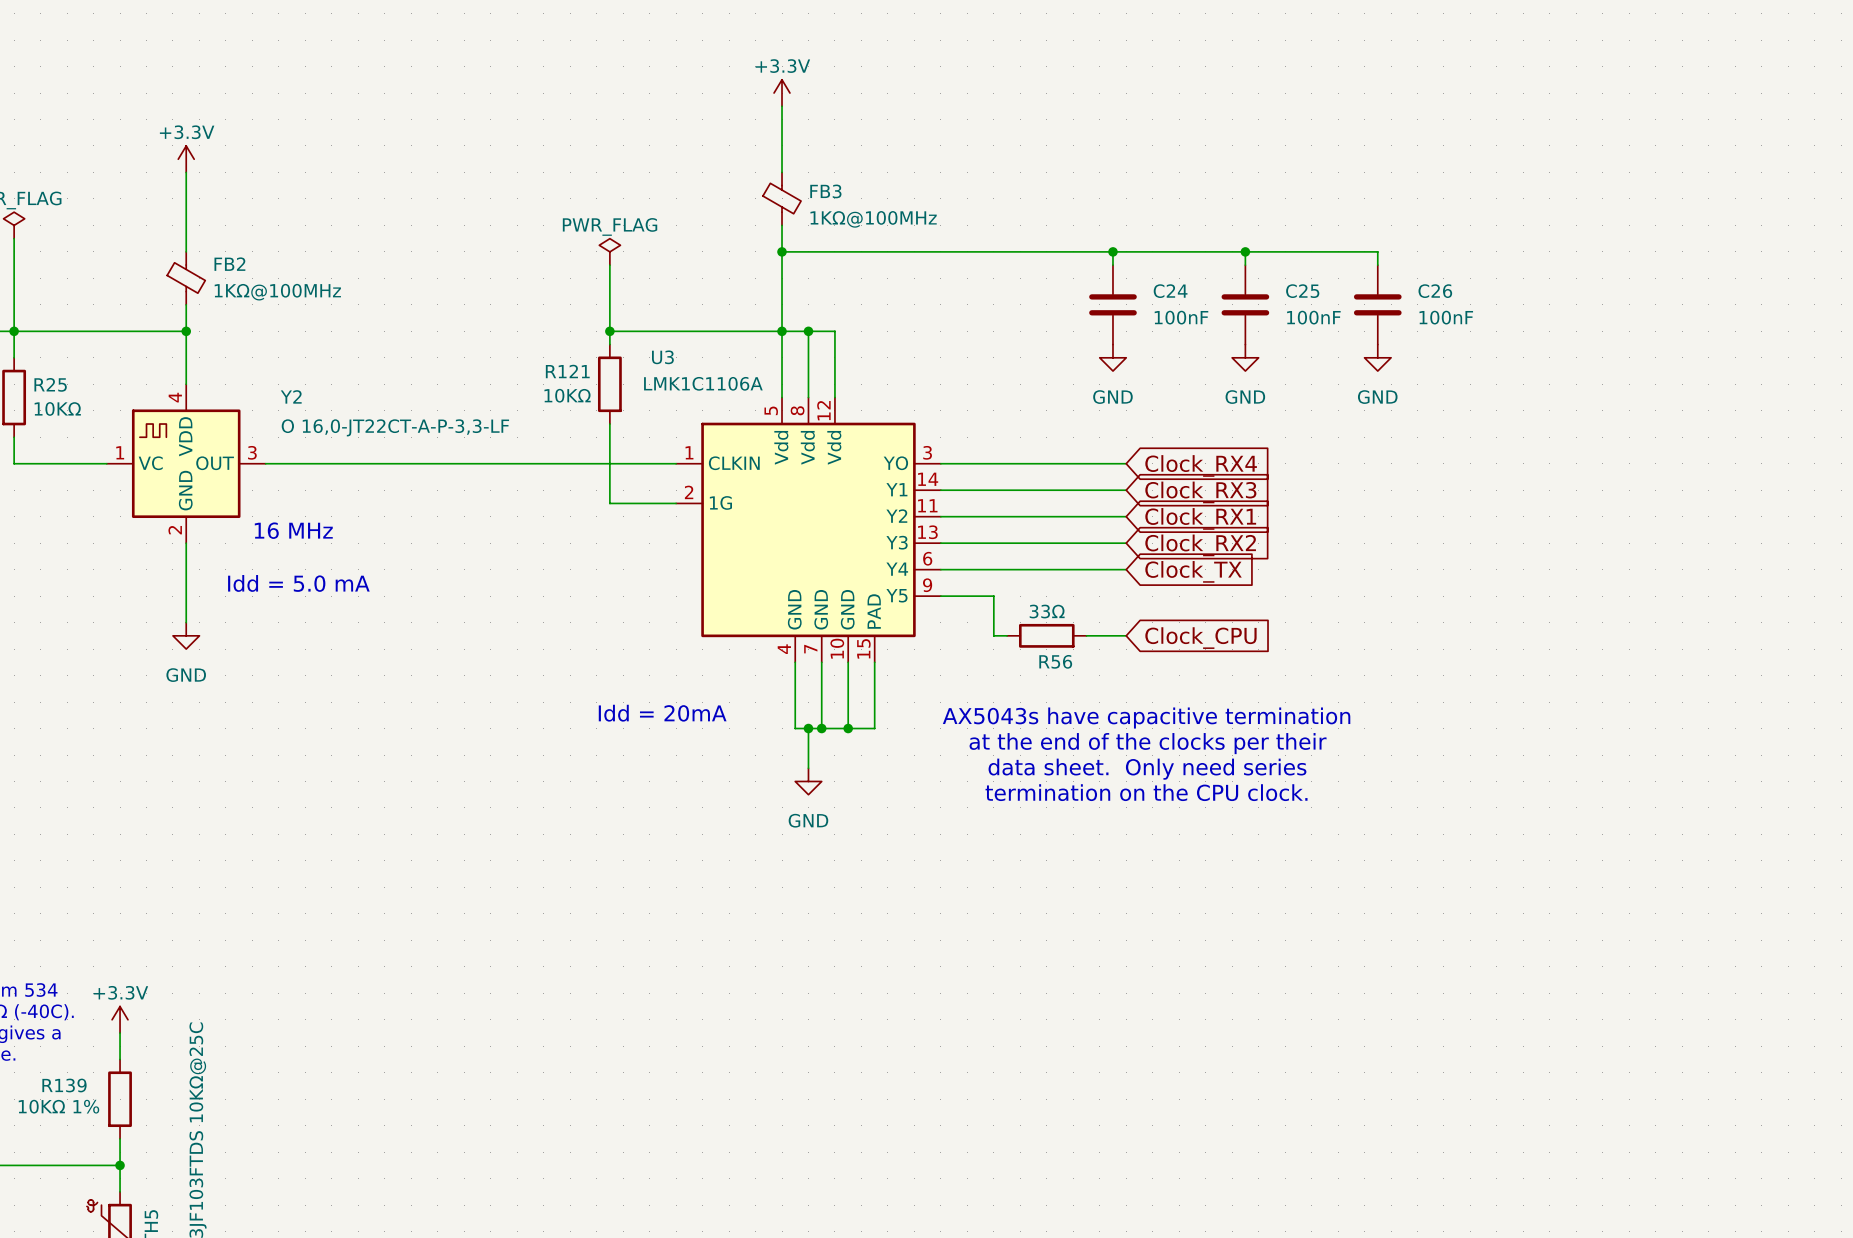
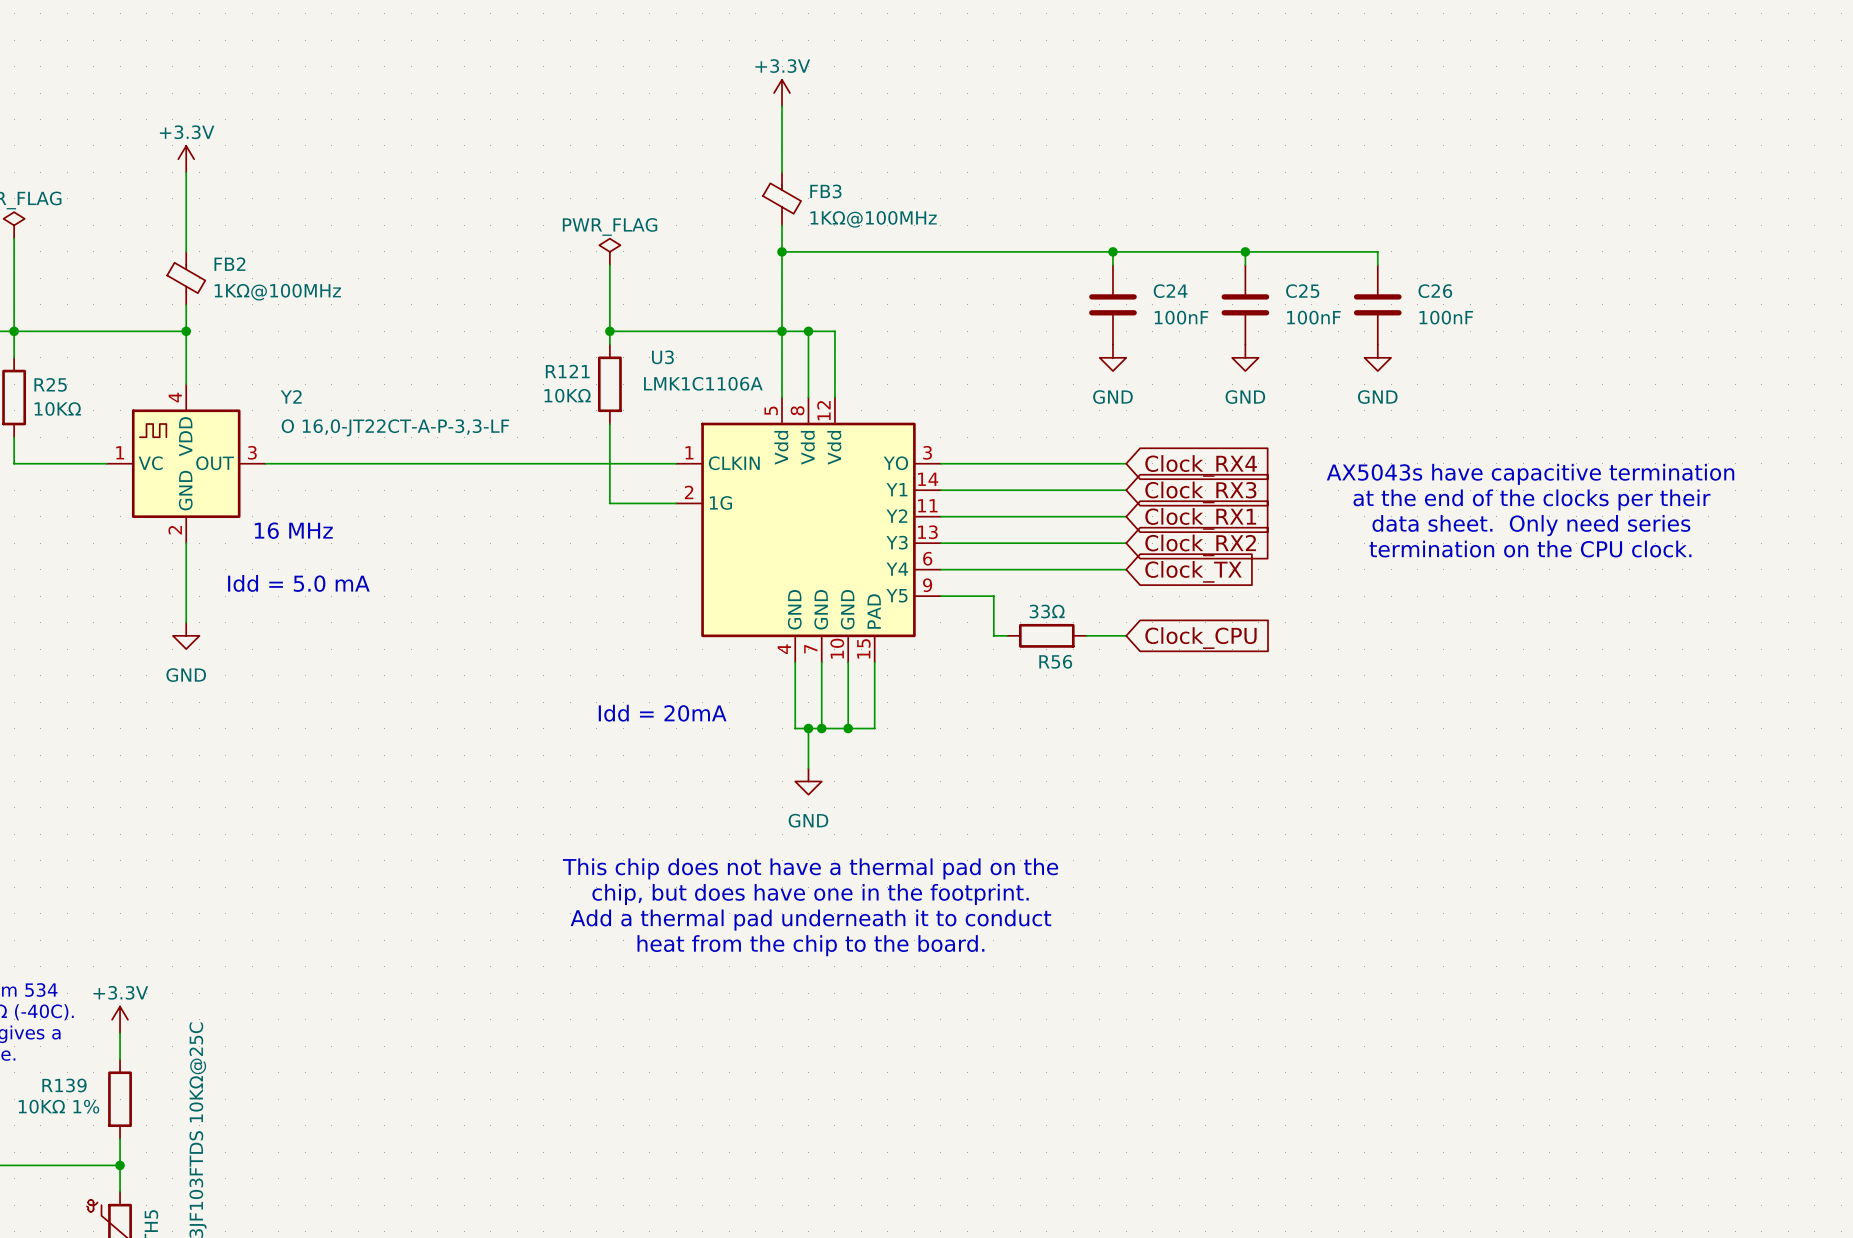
text: none -> AX5043s have capacitive termination (1530, 474)
text: none -> at the end of the clocks per their (1532, 499)
text: none -> data sheet. Only need series (1531, 525)
text: none -> termination on the CPU clock. (1530, 549)
text: AX5043s have capacitive termination (1146, 718) -> none
text: at the end of the clocks per their (1148, 743) -> none
text: data sheet. Only need series (1147, 769) -> none
text: termination on the CPU clock. (1146, 792) -> none
text: none -> This chip does not have a thermal pad on the (810, 868)
text: none -> chip, but does have one in the footprint. (810, 894)
text: none -> Add a thermal pad underneath it to conduct (810, 920)
text: none -> heat from the chip to the board. (810, 945)

